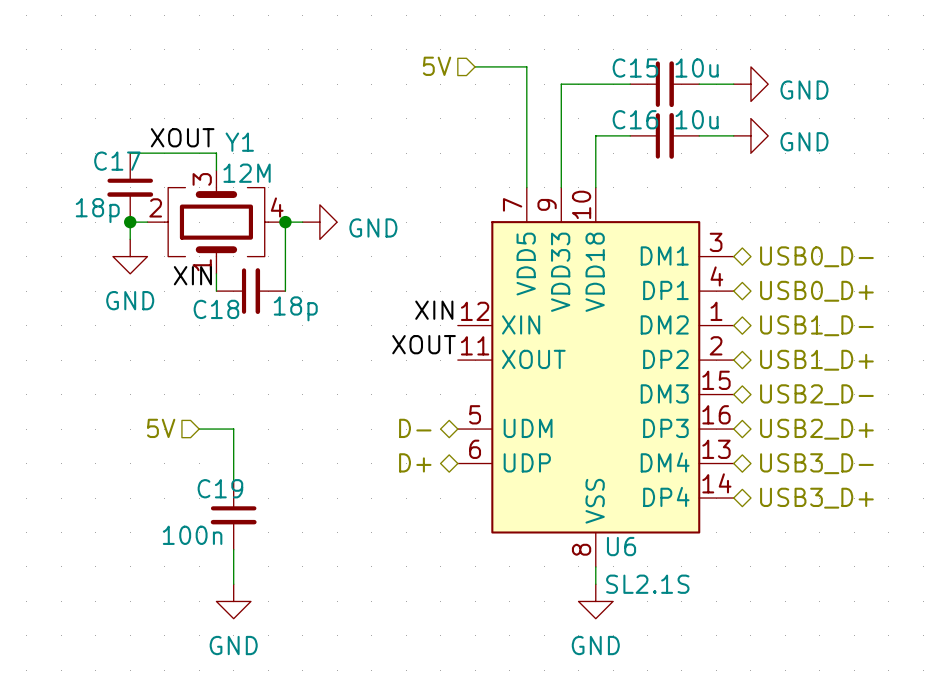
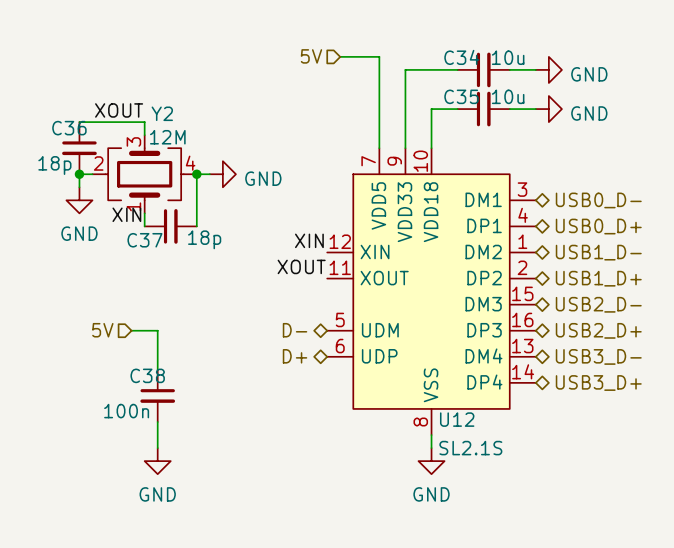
C15 name: C15 (635, 68) -> C34 (461, 57)
C16 name: C16 (635, 119) -> C35 (461, 96)
Y1 name: Y1 (239, 142) -> Y2 (162, 113)
C17 name: C17 (117, 161) -> C36 (69, 128)
C18 name: C18 (216, 309) -> C37 (144, 240)
C19 name: C19 (220, 488) -> C38 (147, 375)
U6 name: U6 (621, 546) -> U12 (457, 419)

